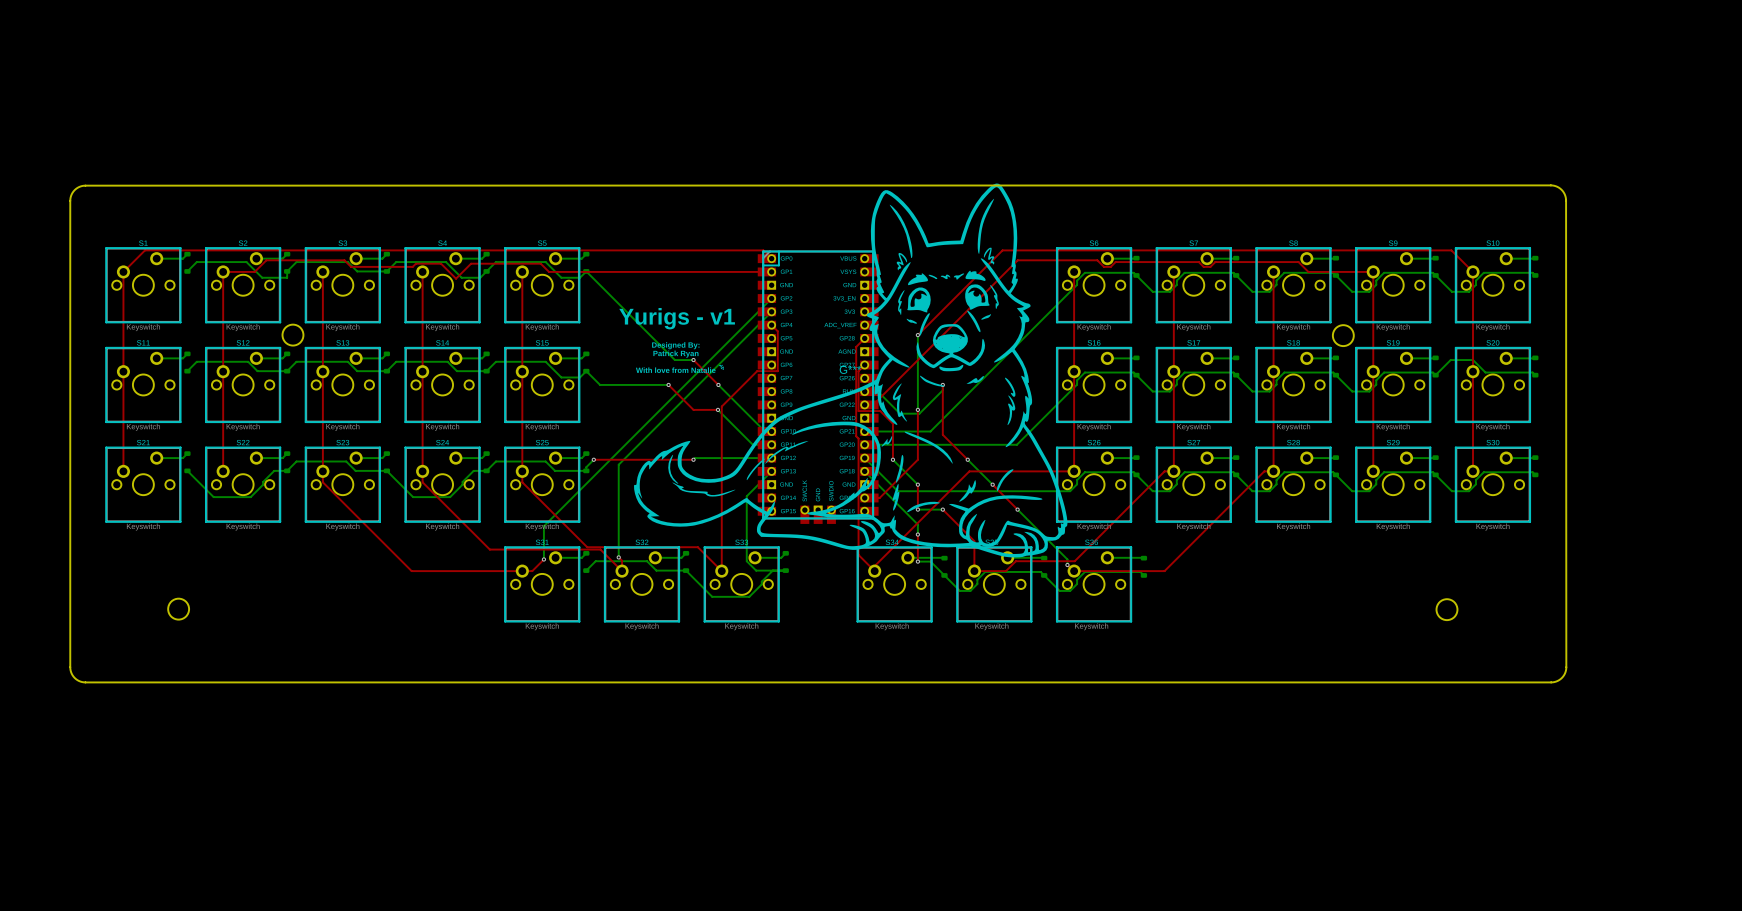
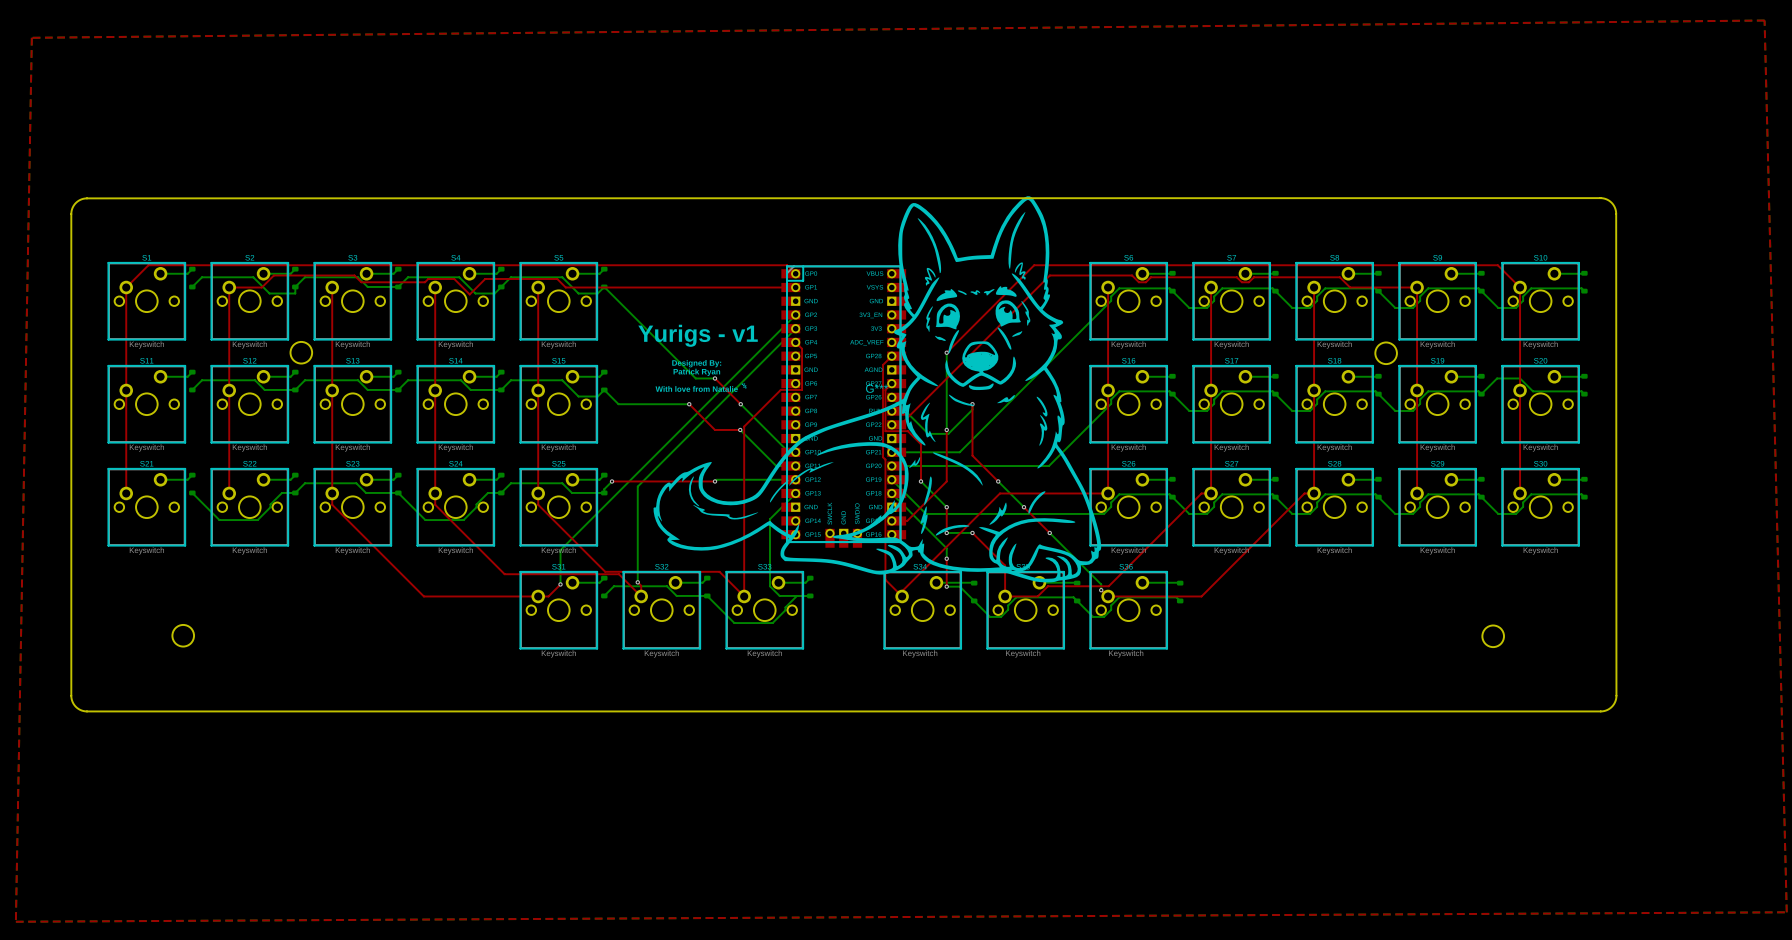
top zone outline: none -> (1764, 20) (1786, 912) (15, 921) (31, 37) (1764, 20)

